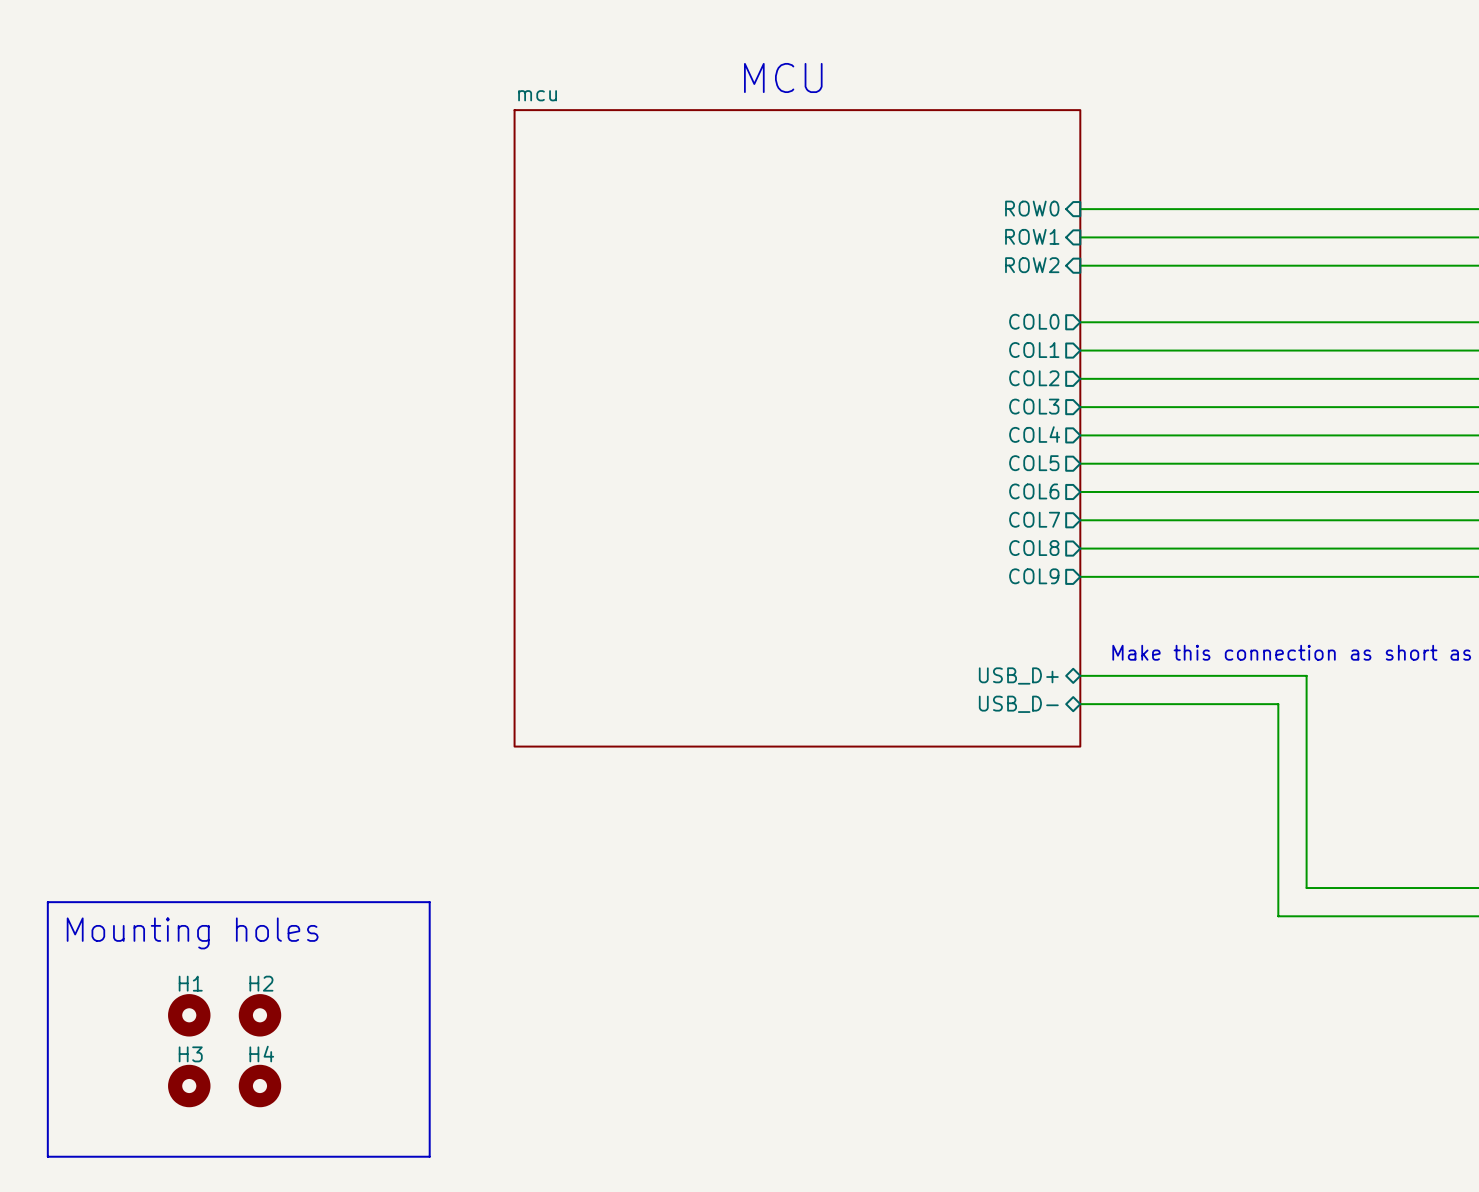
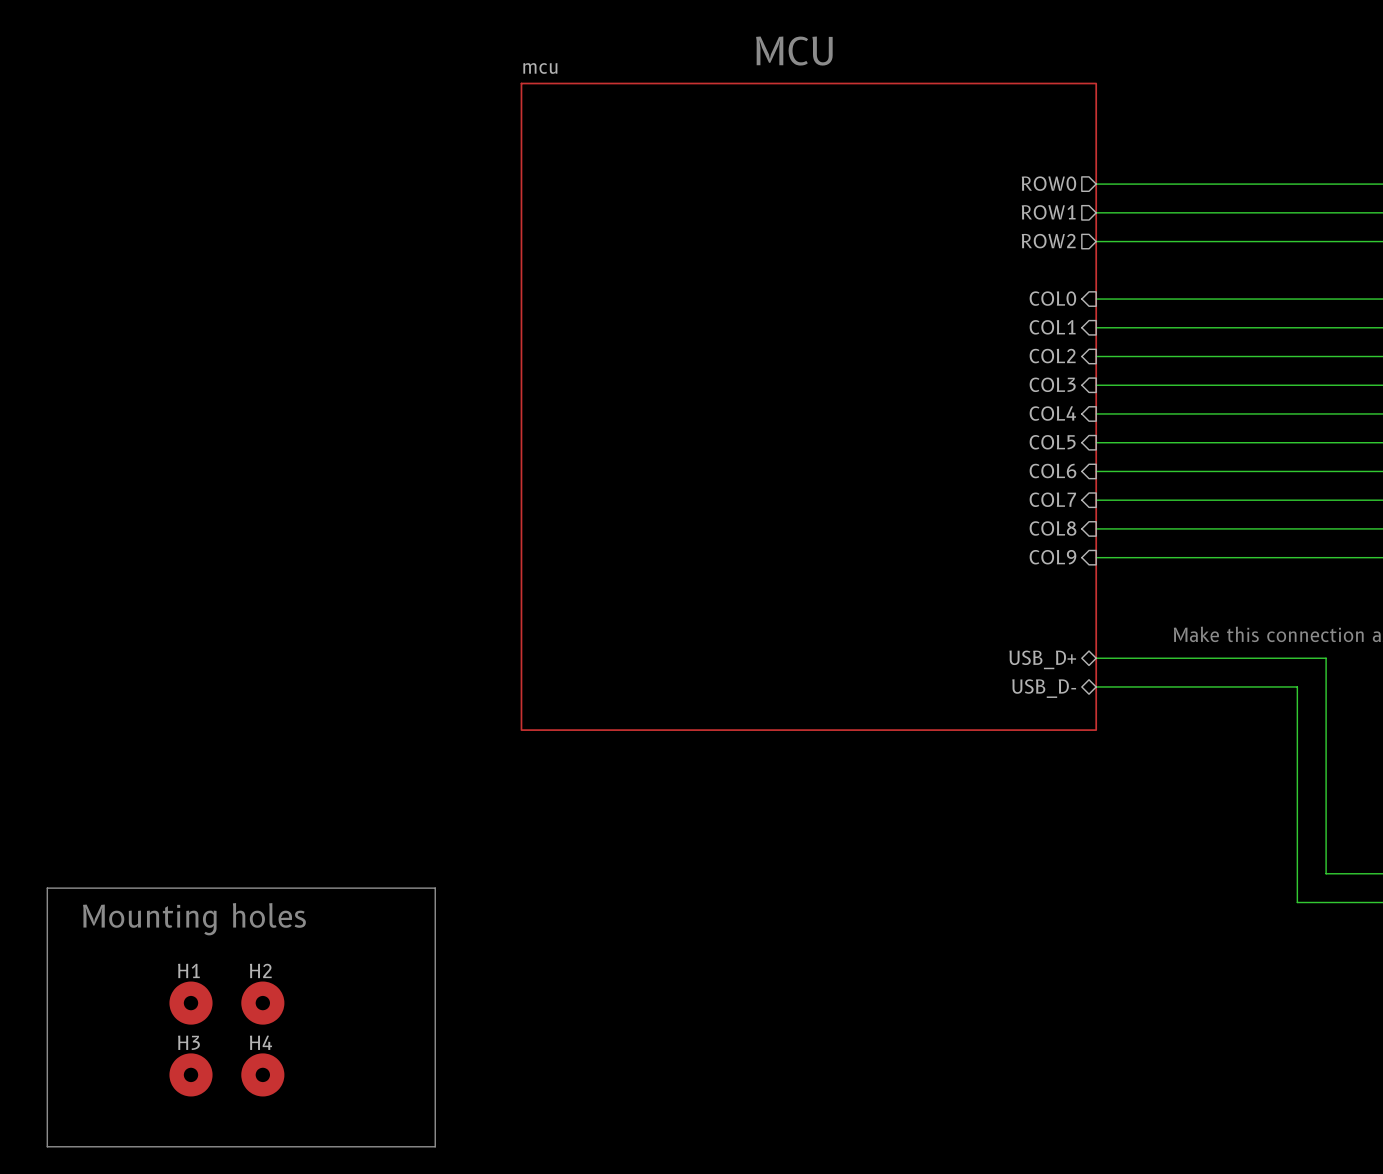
sheet pin shape: input (1032, 208) -> output (1048, 183)
sheet pin shape: input (1032, 236) -> output (1048, 212)
sheet pin shape: input (1032, 265) -> output (1048, 241)
sheet pin shape: output (1034, 321) -> input (1052, 298)
sheet pin shape: output (1034, 350) -> input (1052, 327)
sheet pin shape: output (1034, 378) -> input (1052, 356)
sheet pin shape: output (1034, 406) -> input (1052, 384)
sheet pin shape: output (1034, 434) -> input (1052, 413)
sheet pin shape: output (1034, 463) -> input (1052, 442)
sheet pin shape: output (1034, 491) -> input (1052, 471)
sheet pin shape: output (1034, 519) -> input (1052, 499)
sheet pin shape: output (1034, 548) -> input (1053, 528)
sheet pin shape: output (1034, 576) -> input (1052, 557)

